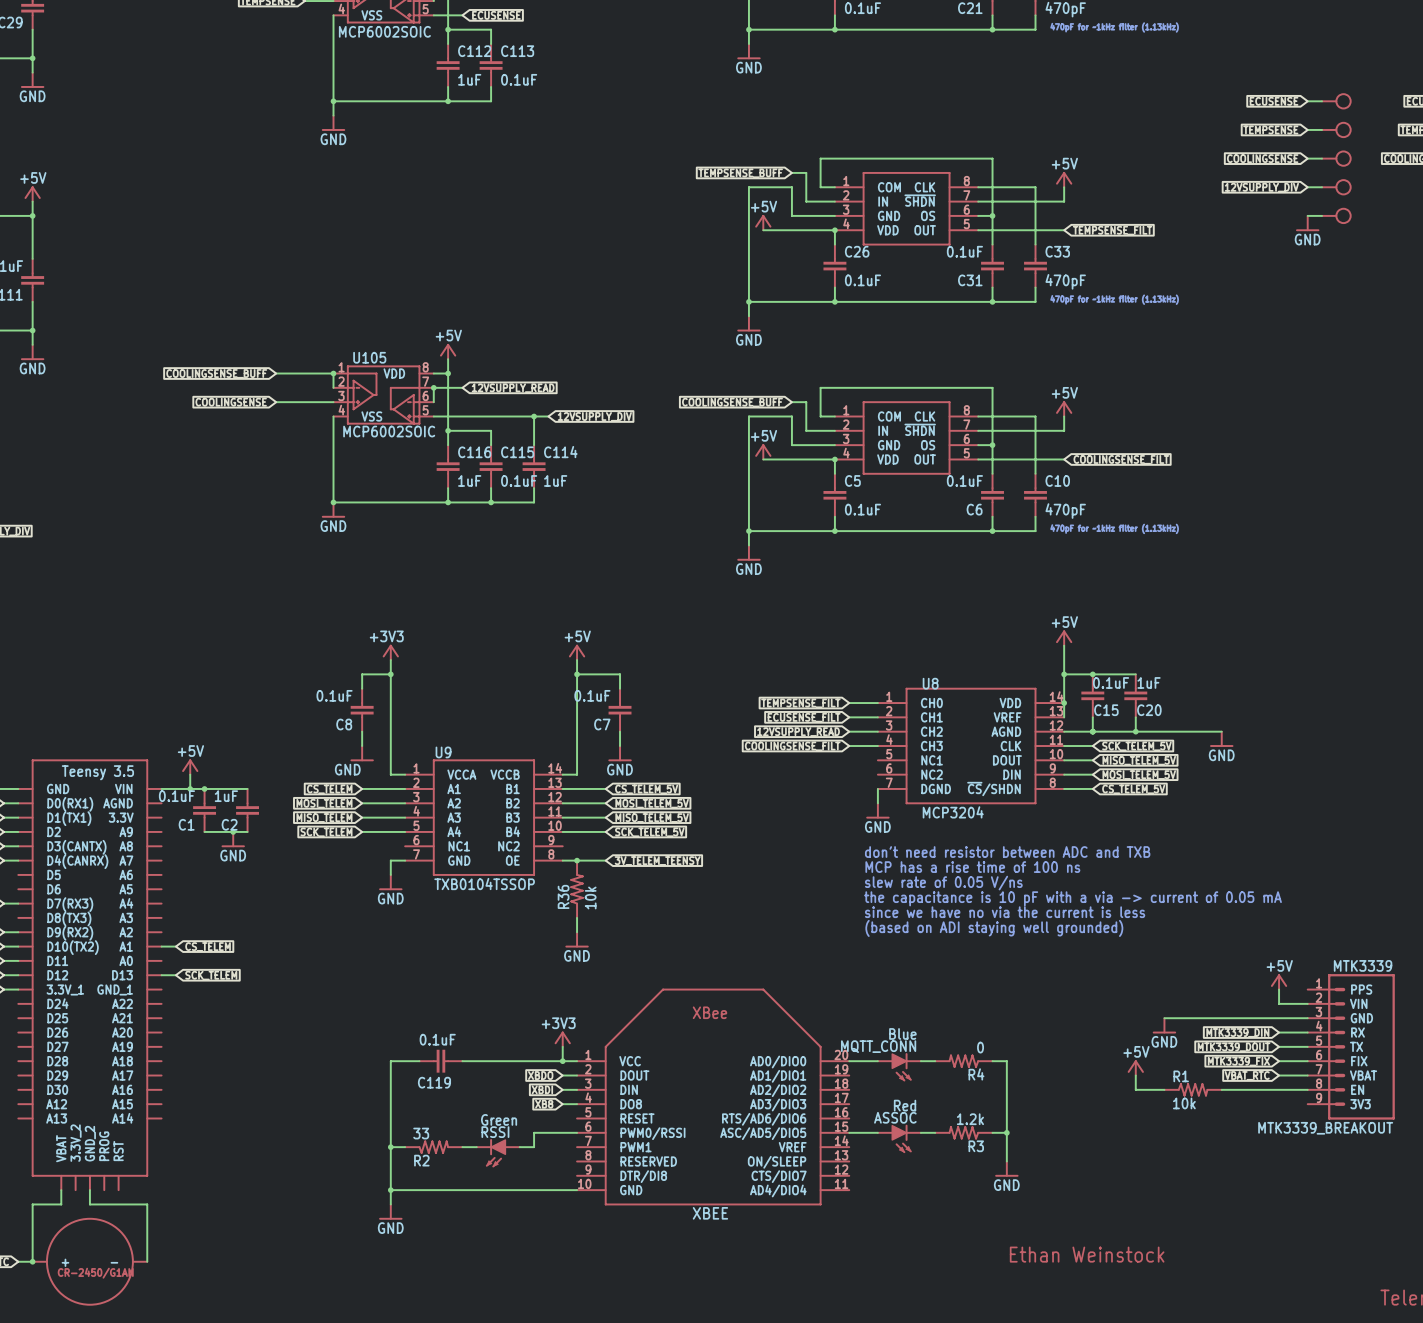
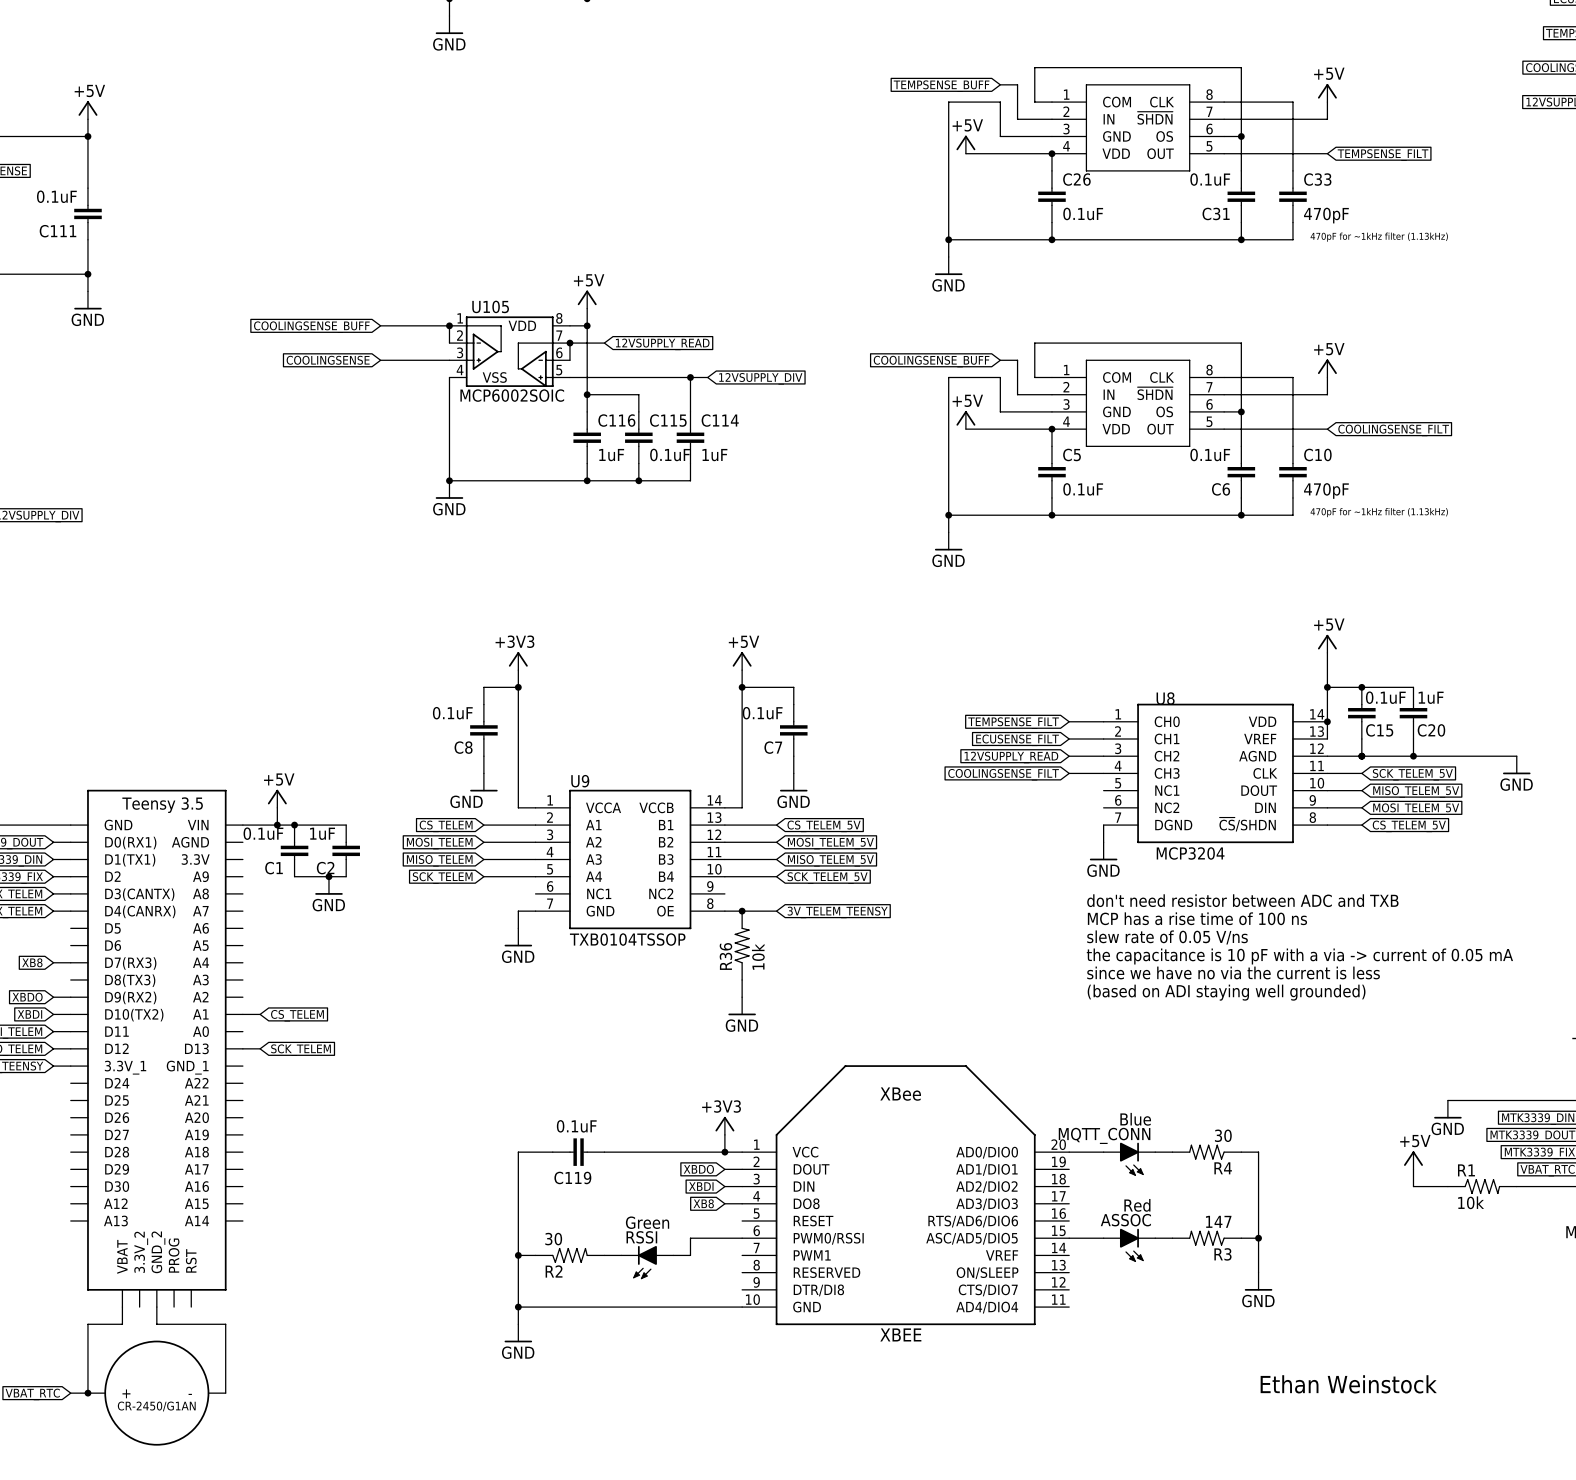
R4 value: 0 (980, 1047) -> 30 (1223, 1135)
R3 value: 1.2k (970, 1119) -> 147 (1218, 1221)
R2 value: 33 (421, 1133) -> 30 (553, 1239)

